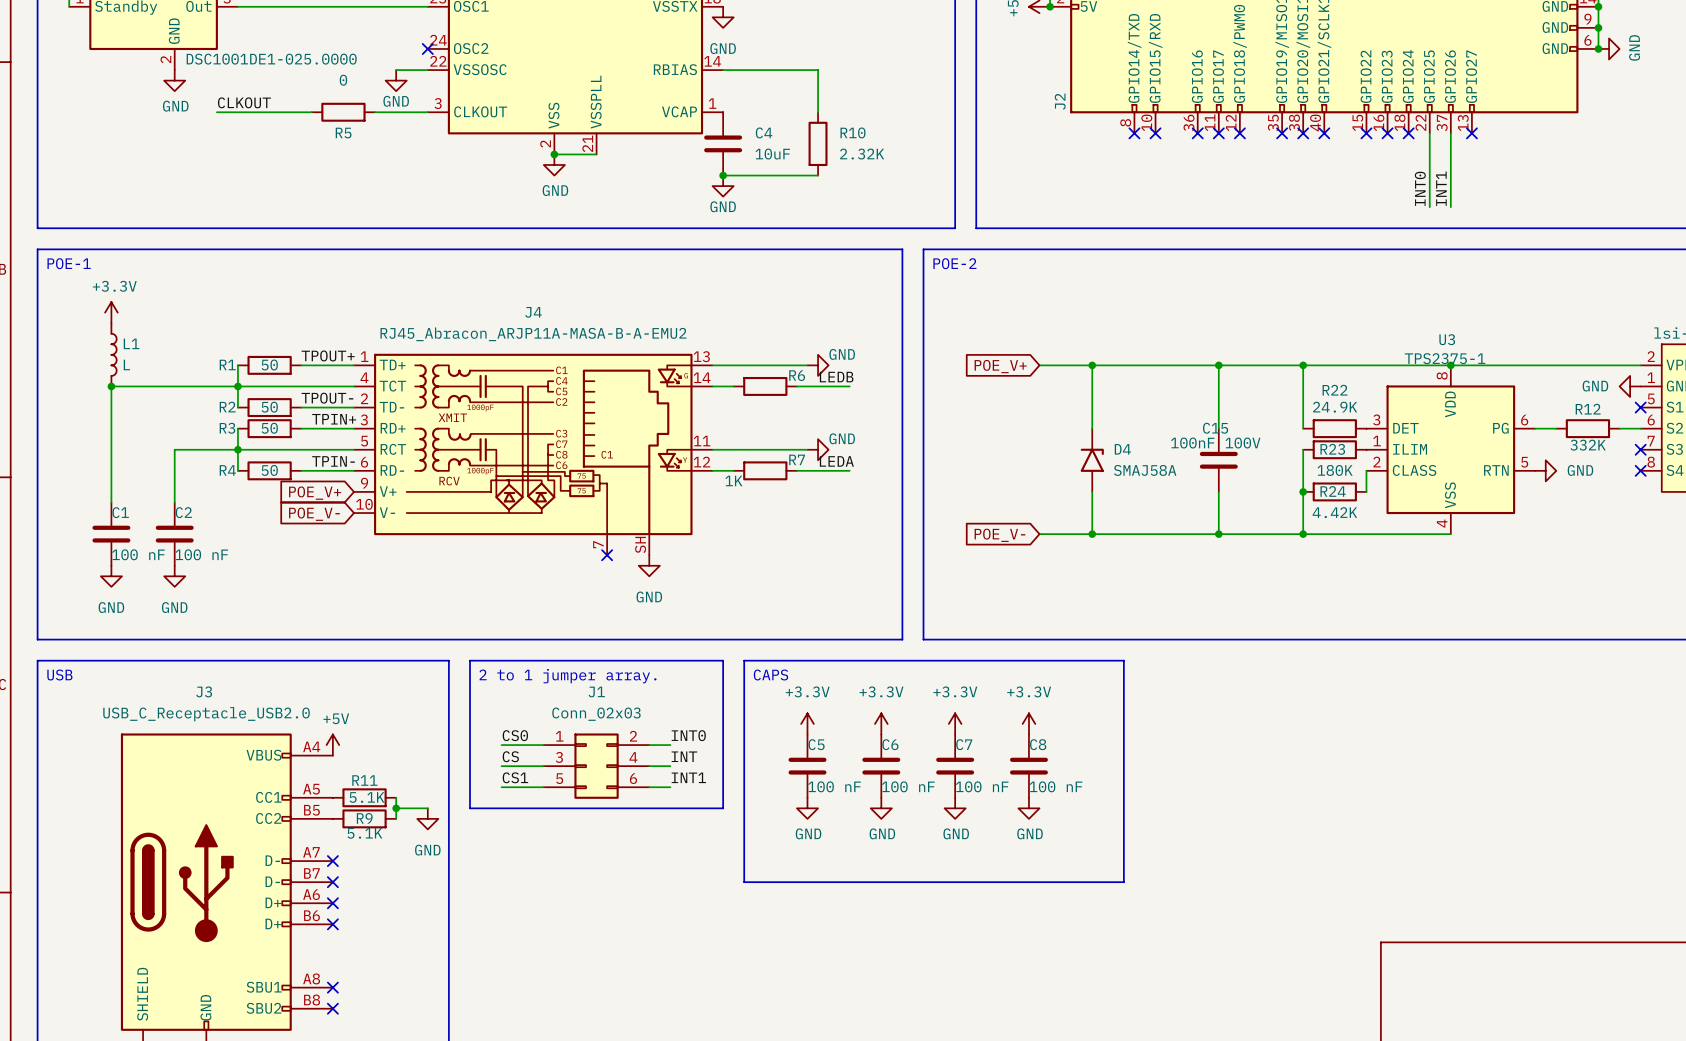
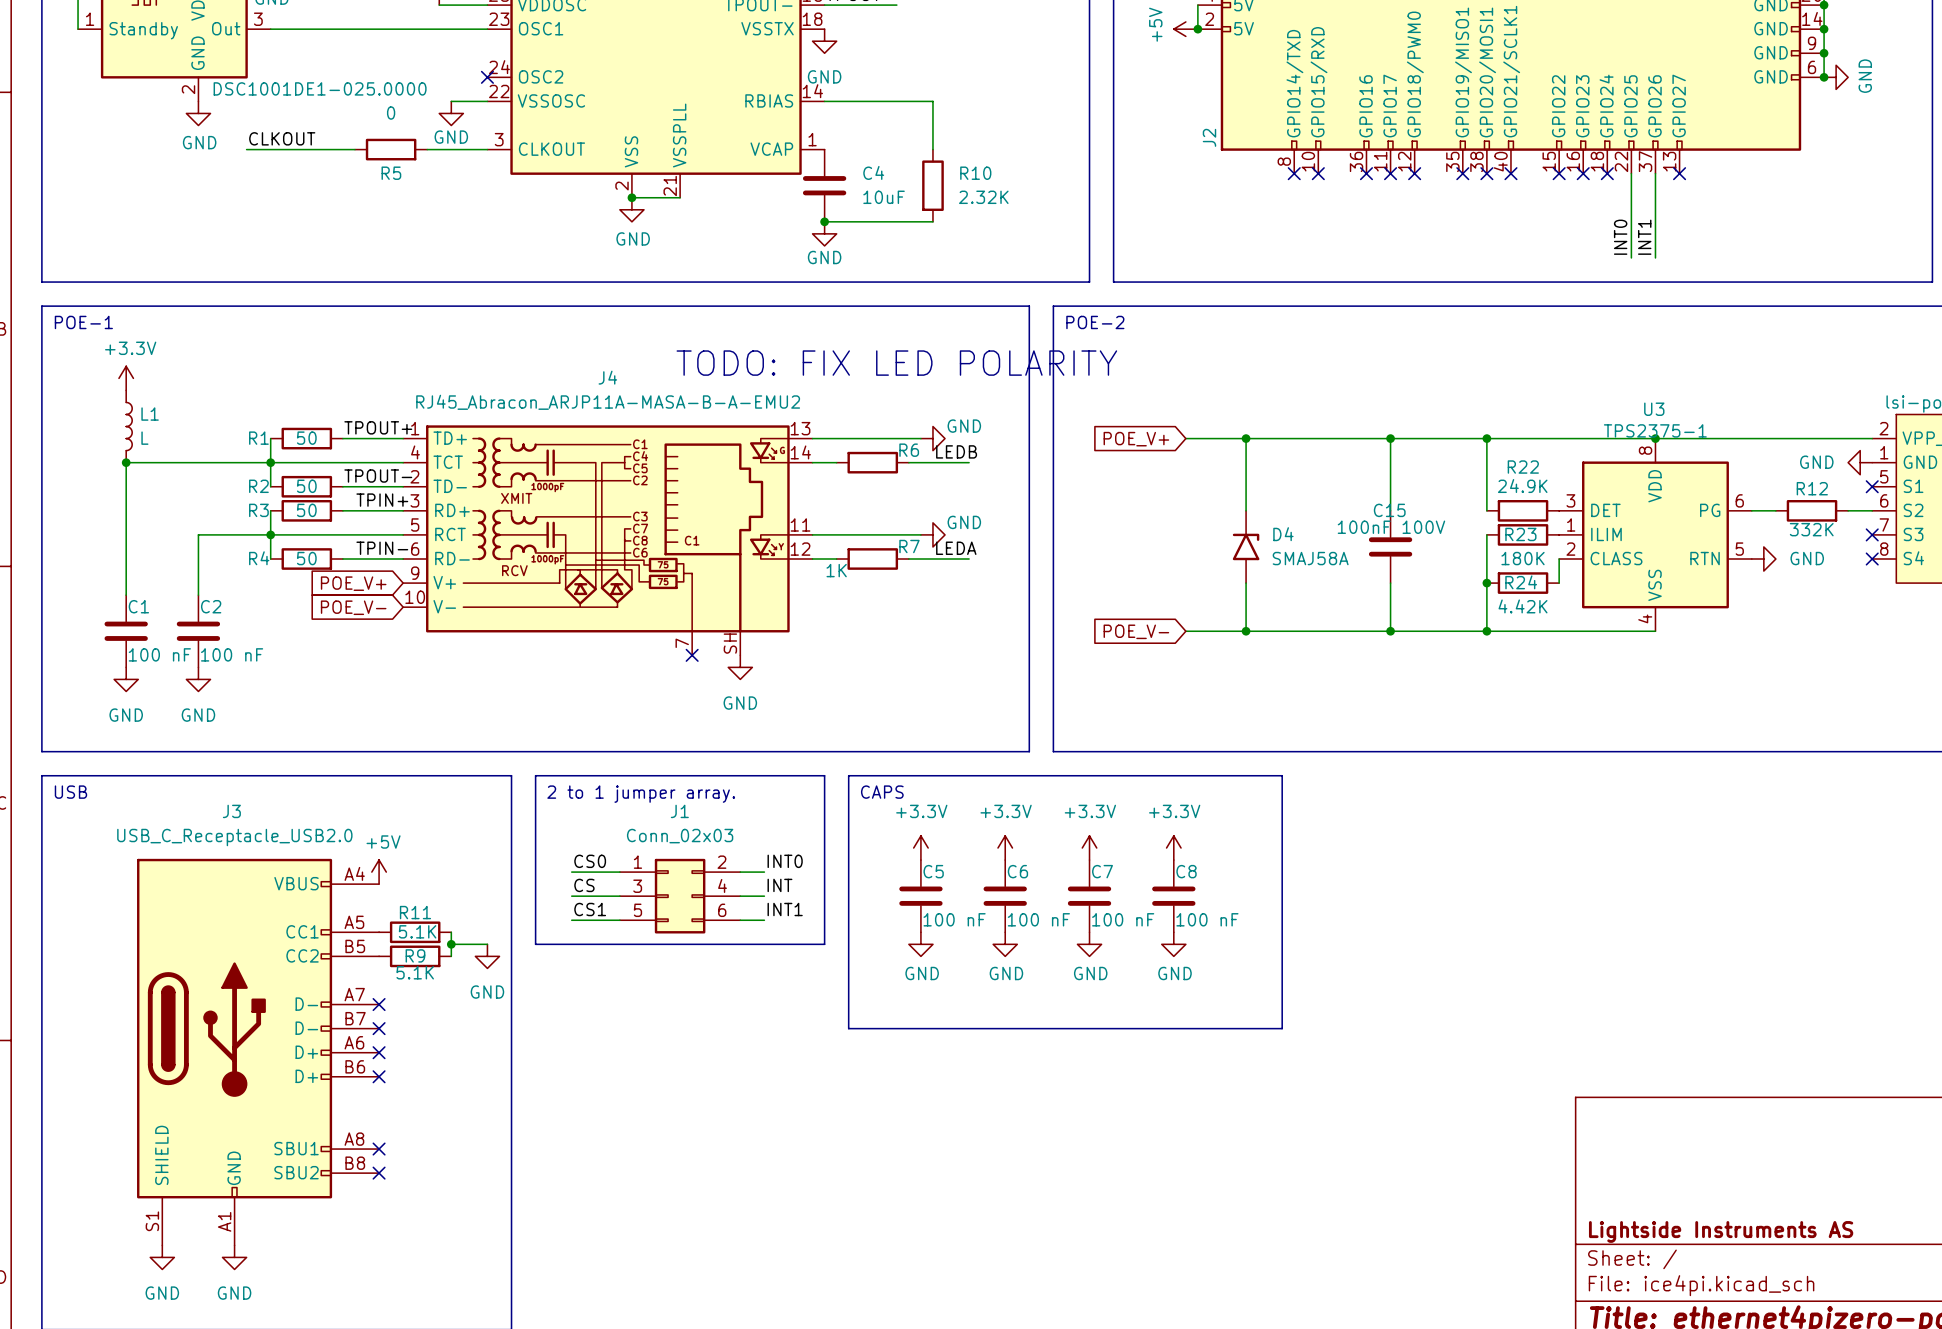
text: none -> TODO: FIX LED POLARITY (896, 363)

